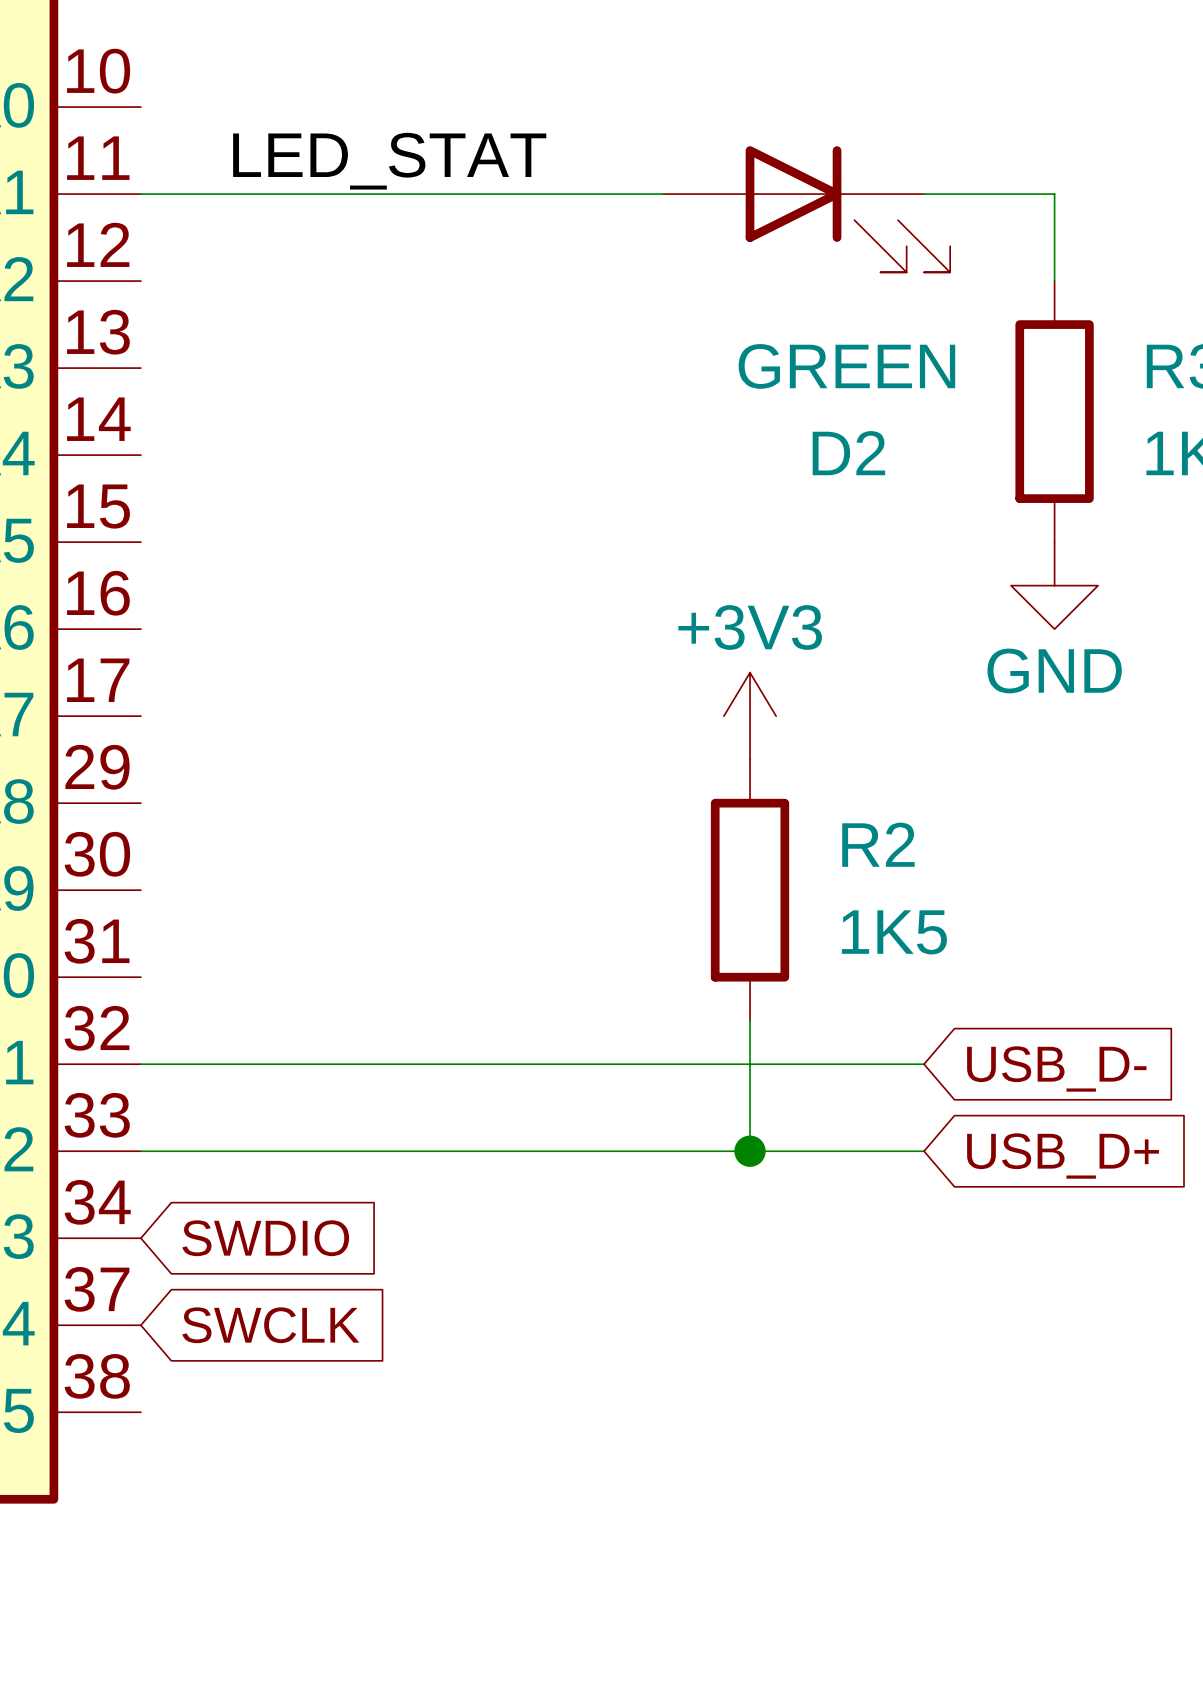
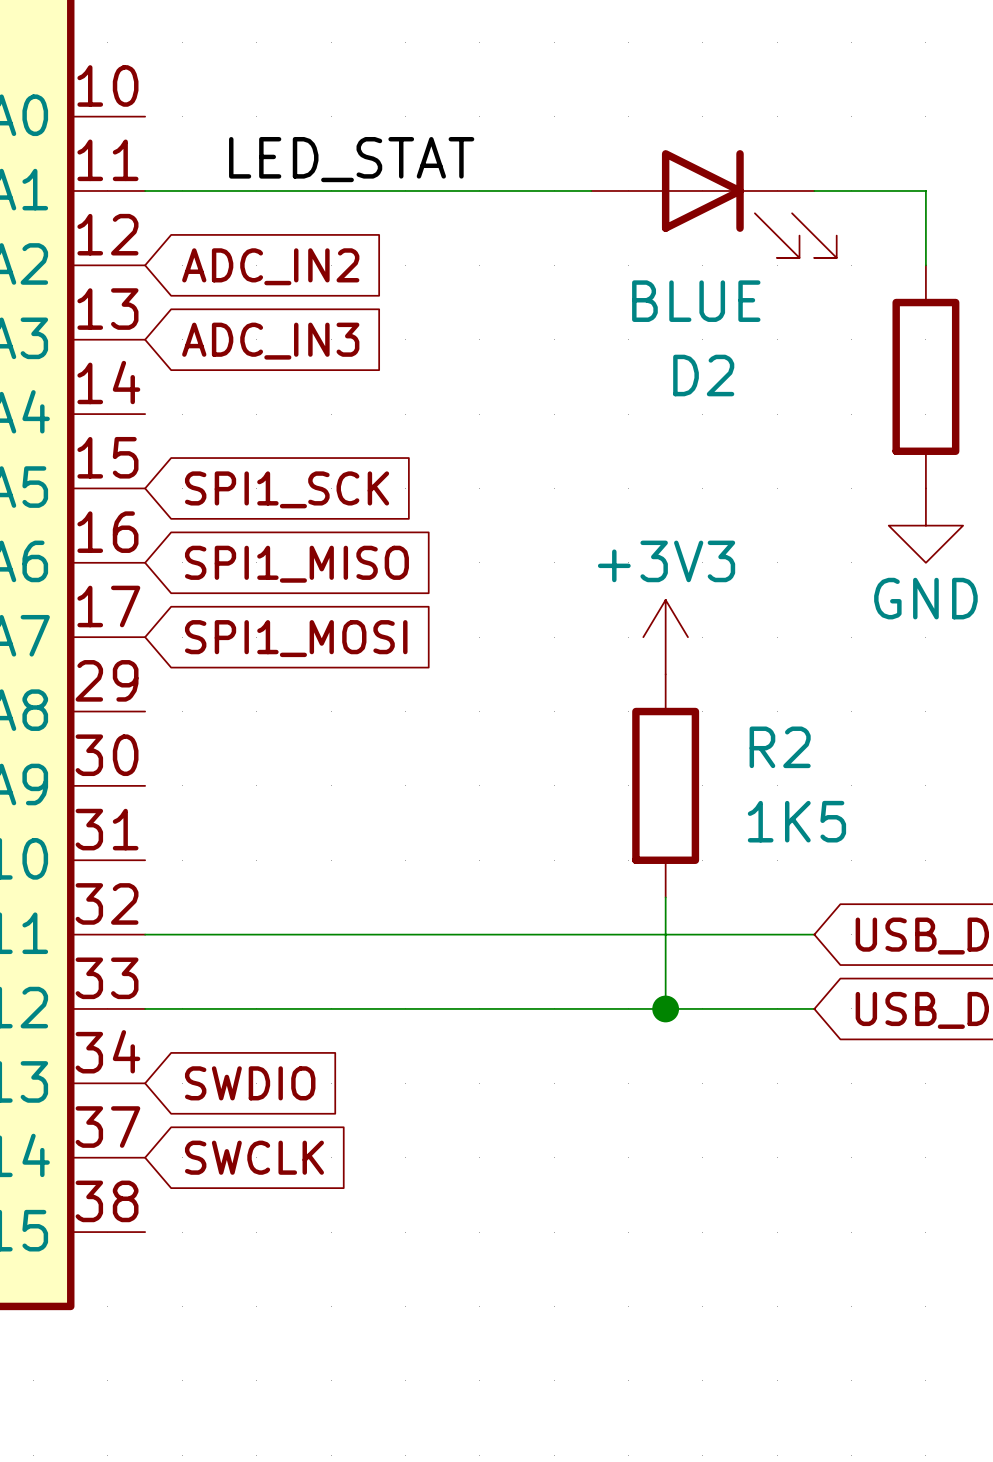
global label: none -> ADC_IN2 (270, 266)
D2 value: GREEN (846, 366) -> BLUE (696, 301)
global label: none -> ADC_IN3 (270, 341)
D2 name position: D2 (848, 453) -> D2 (703, 375)
global label: none -> SPI1_SCK (287, 489)
global label: none -> SPI1_MISO (296, 564)
global label: none -> SPI1_MOSI (296, 638)

